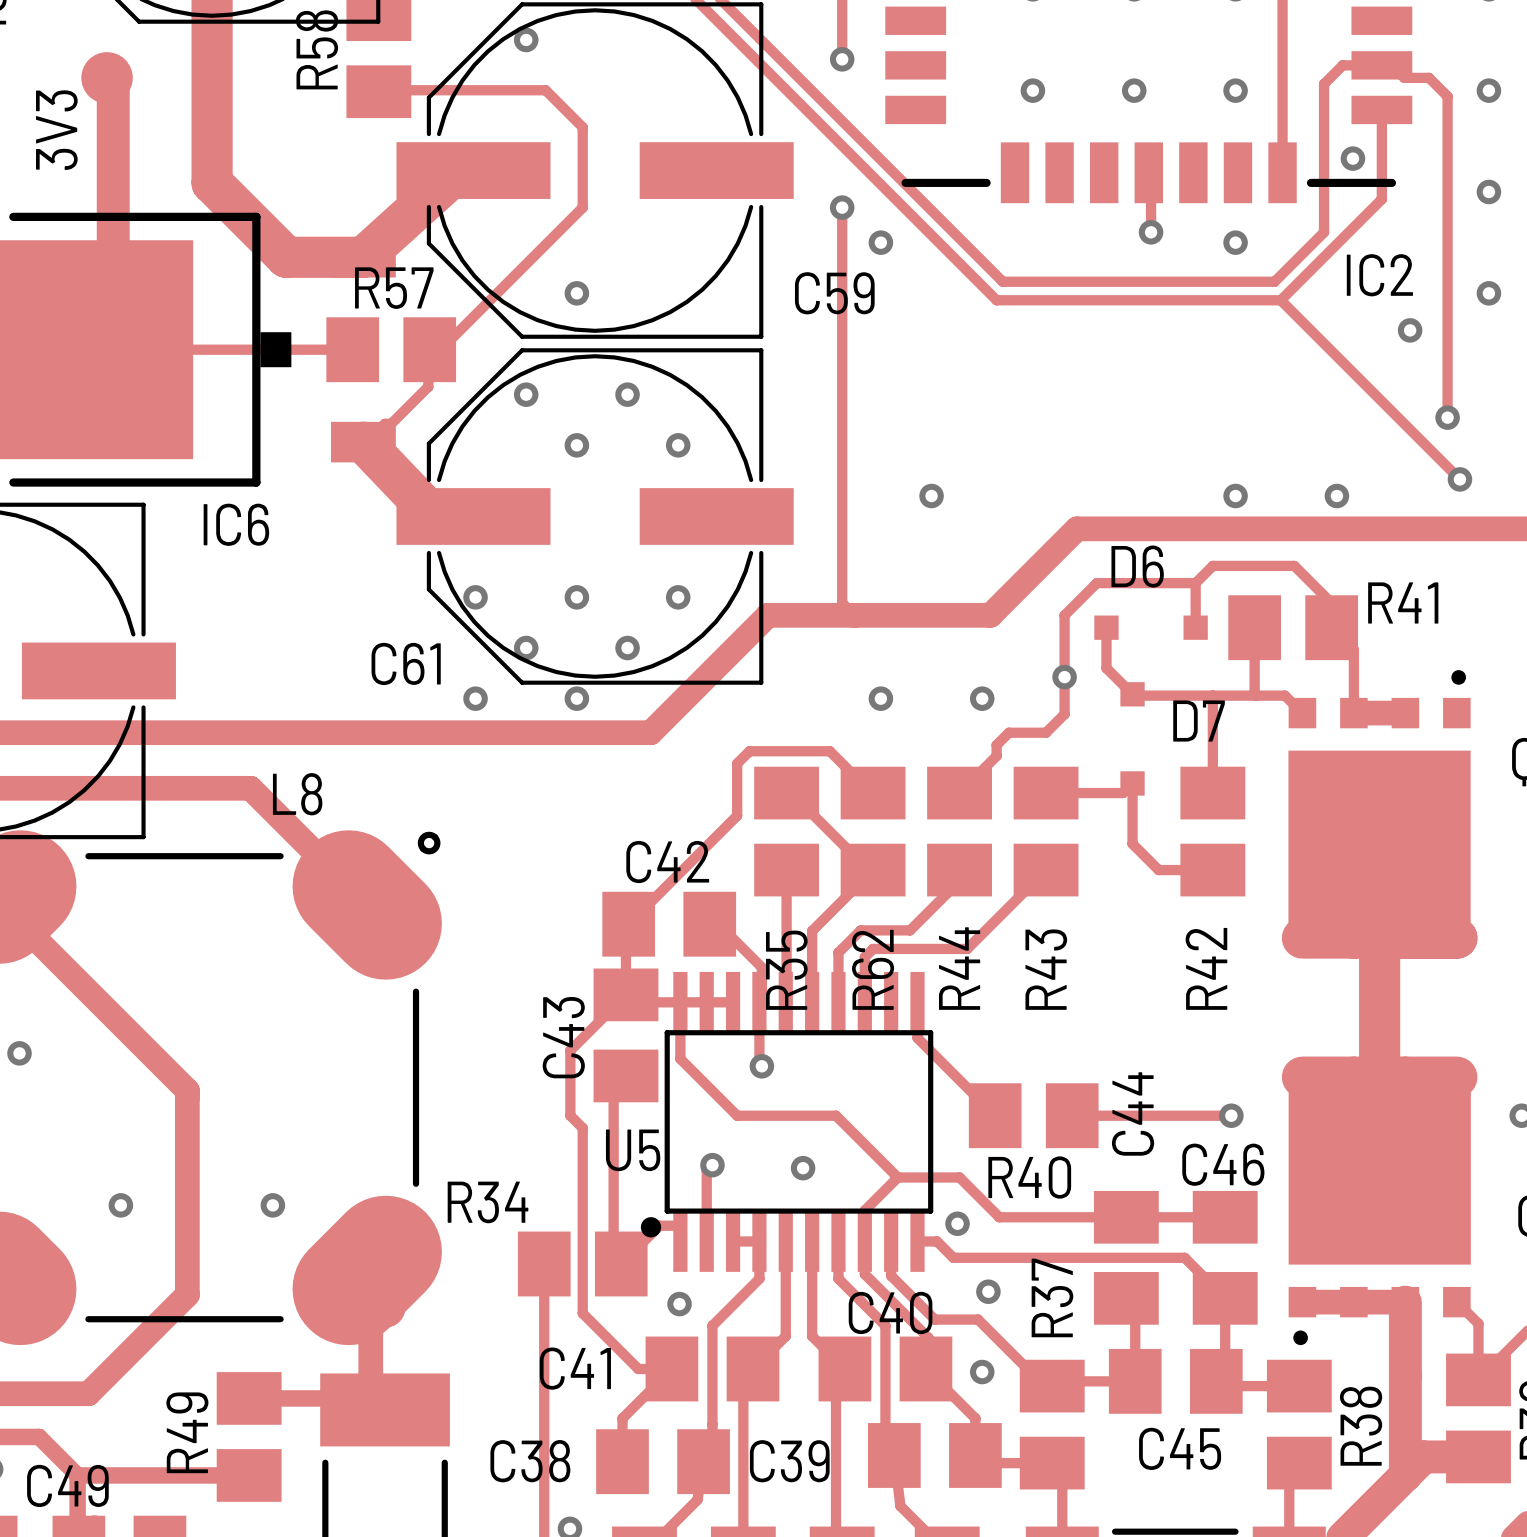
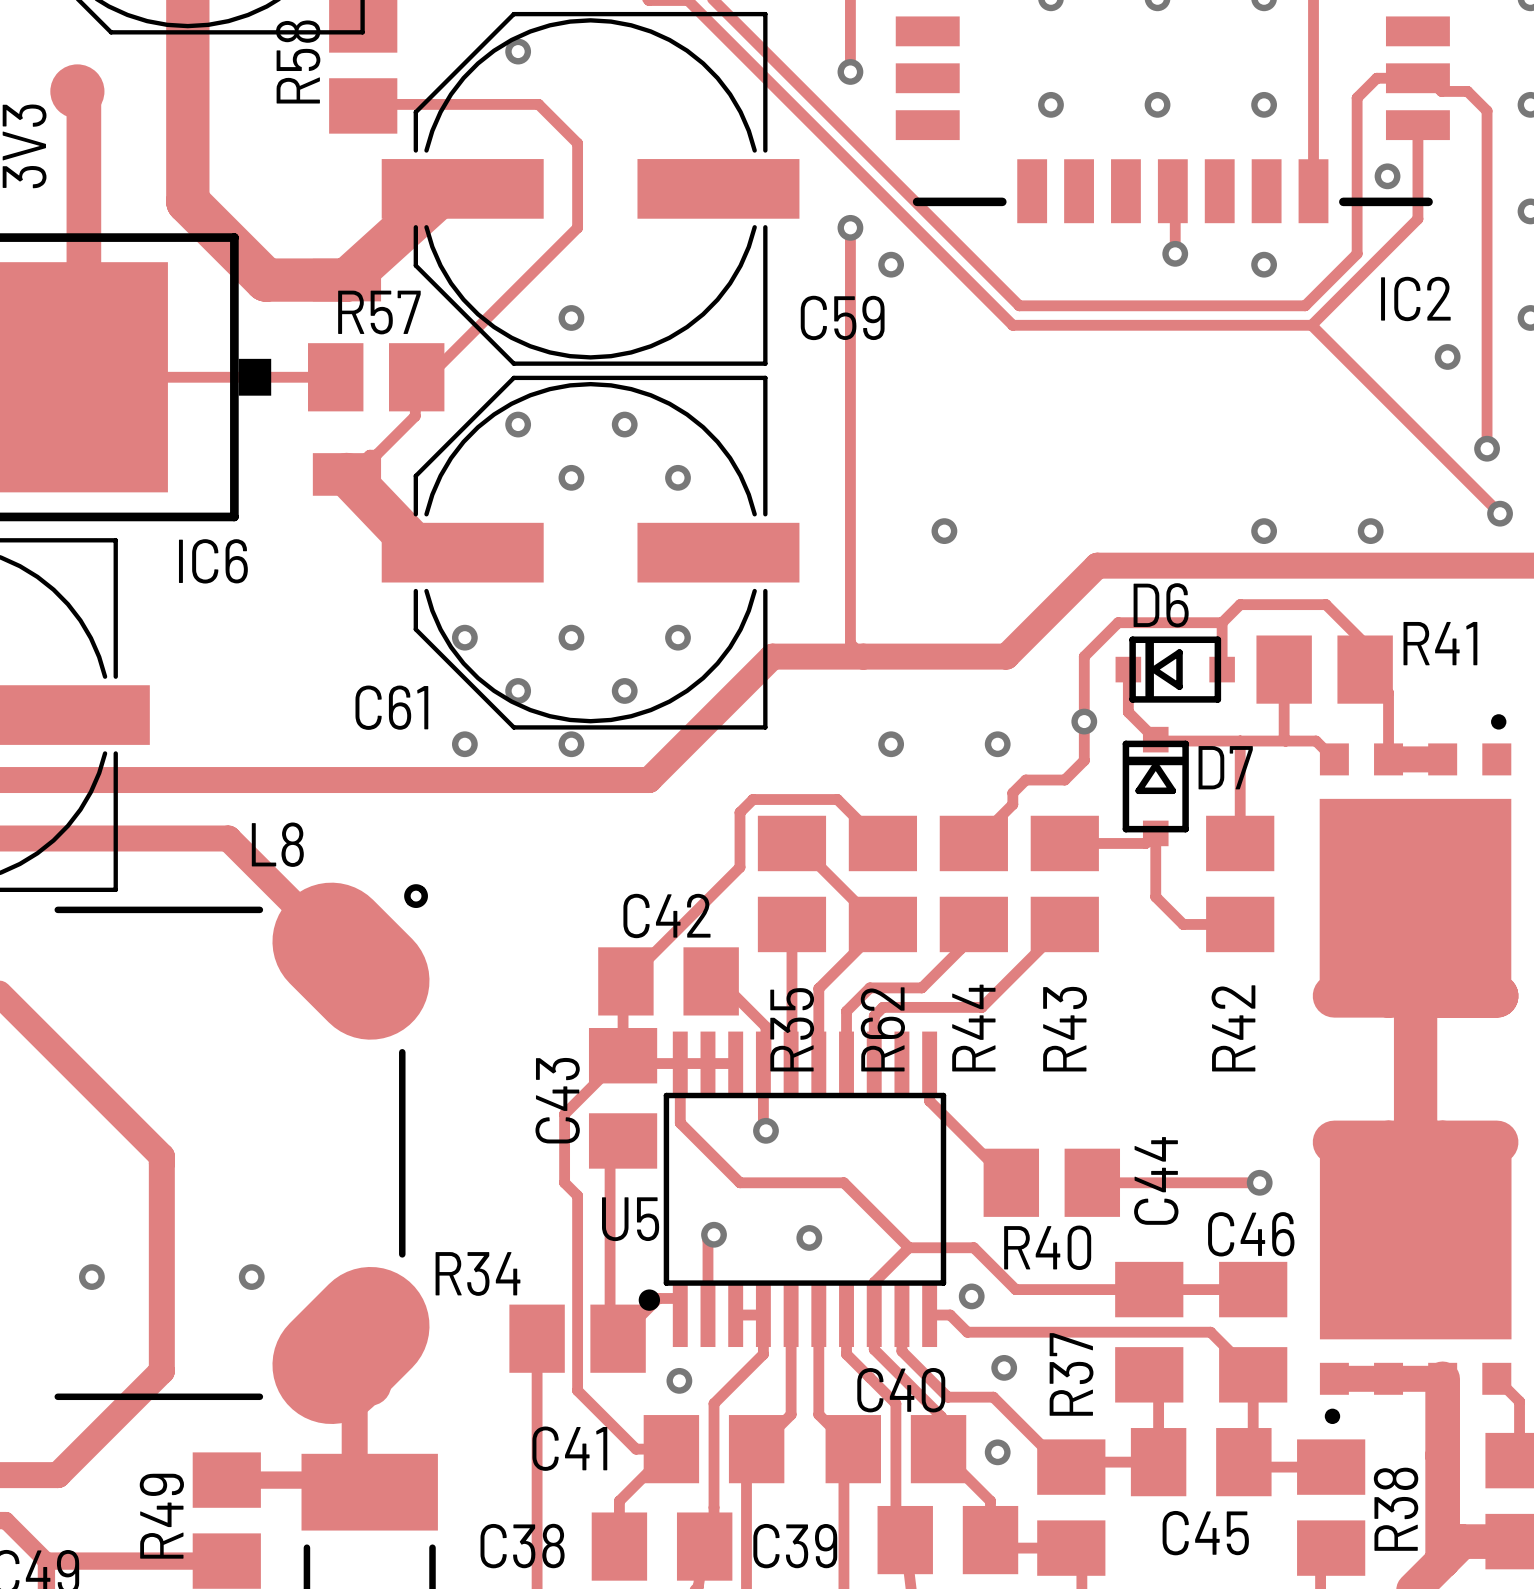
D6 footprint: [1094, 615, 1208, 640] -> [1115, 636, 1235, 703]
D7 footprint: [1120, 682, 1145, 796] -> [1122, 726, 1189, 847]

